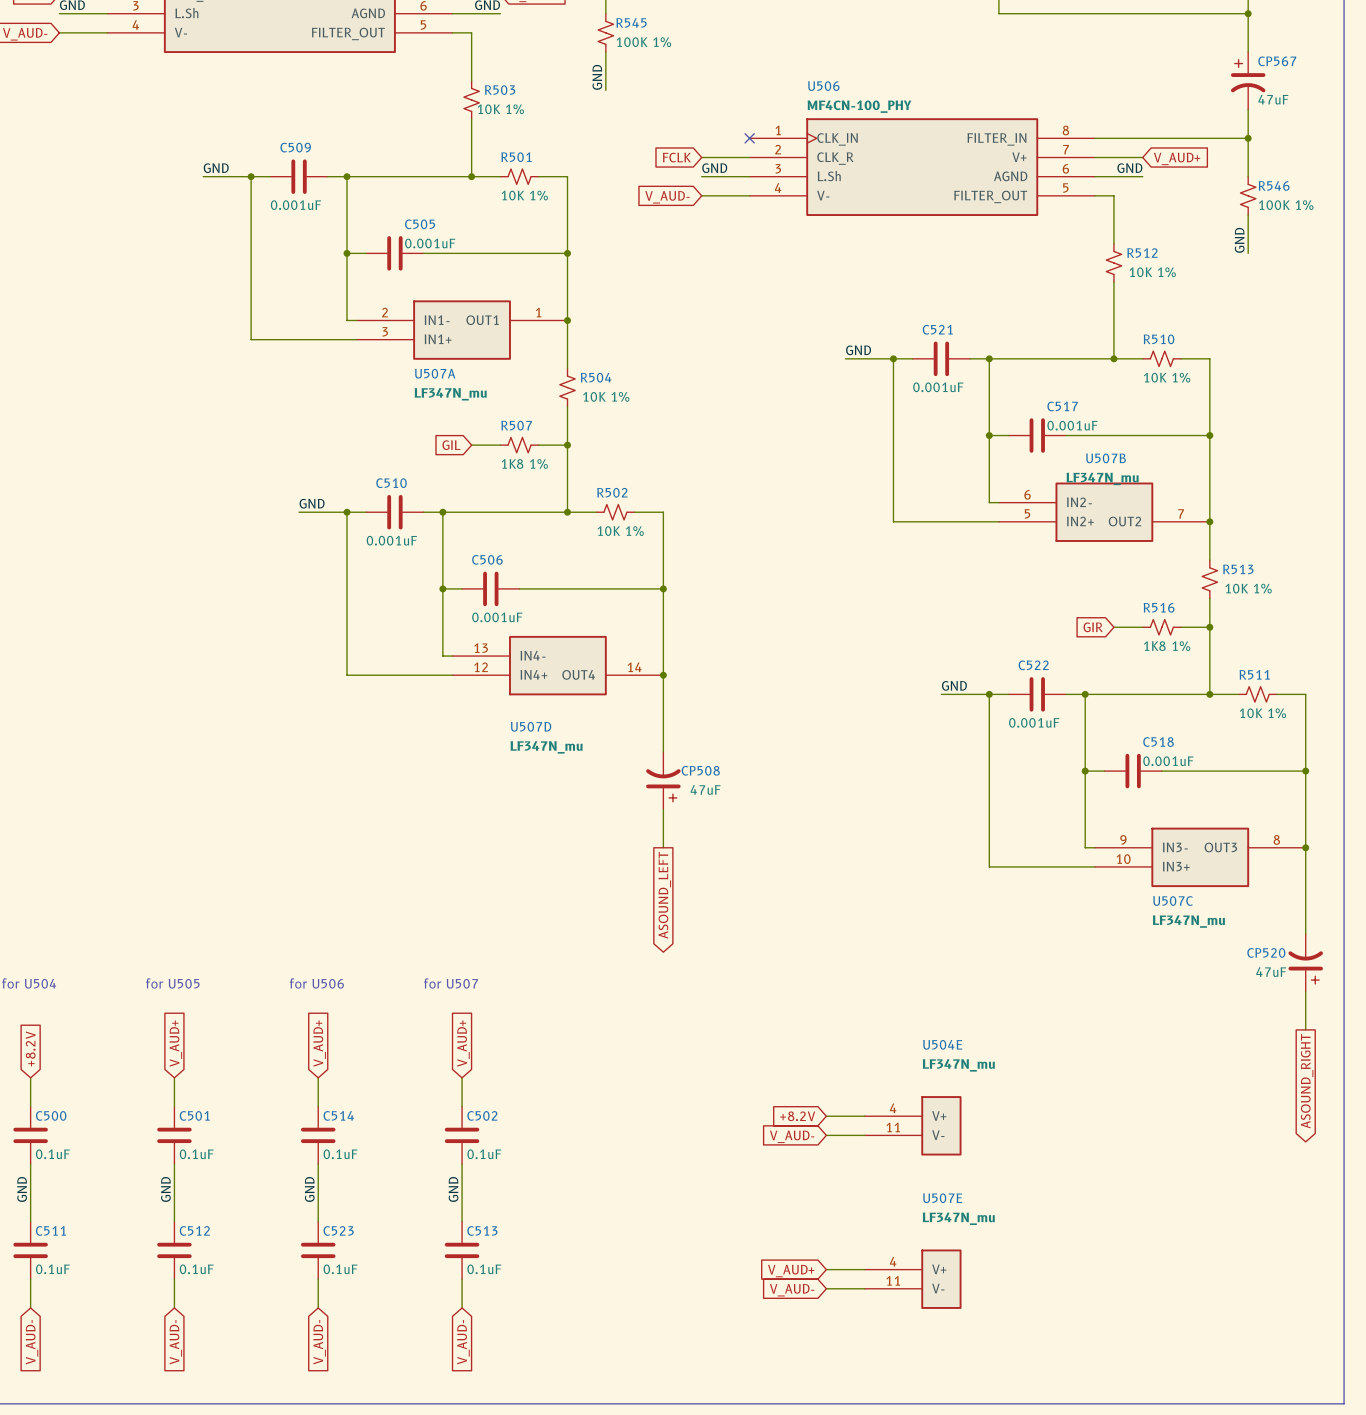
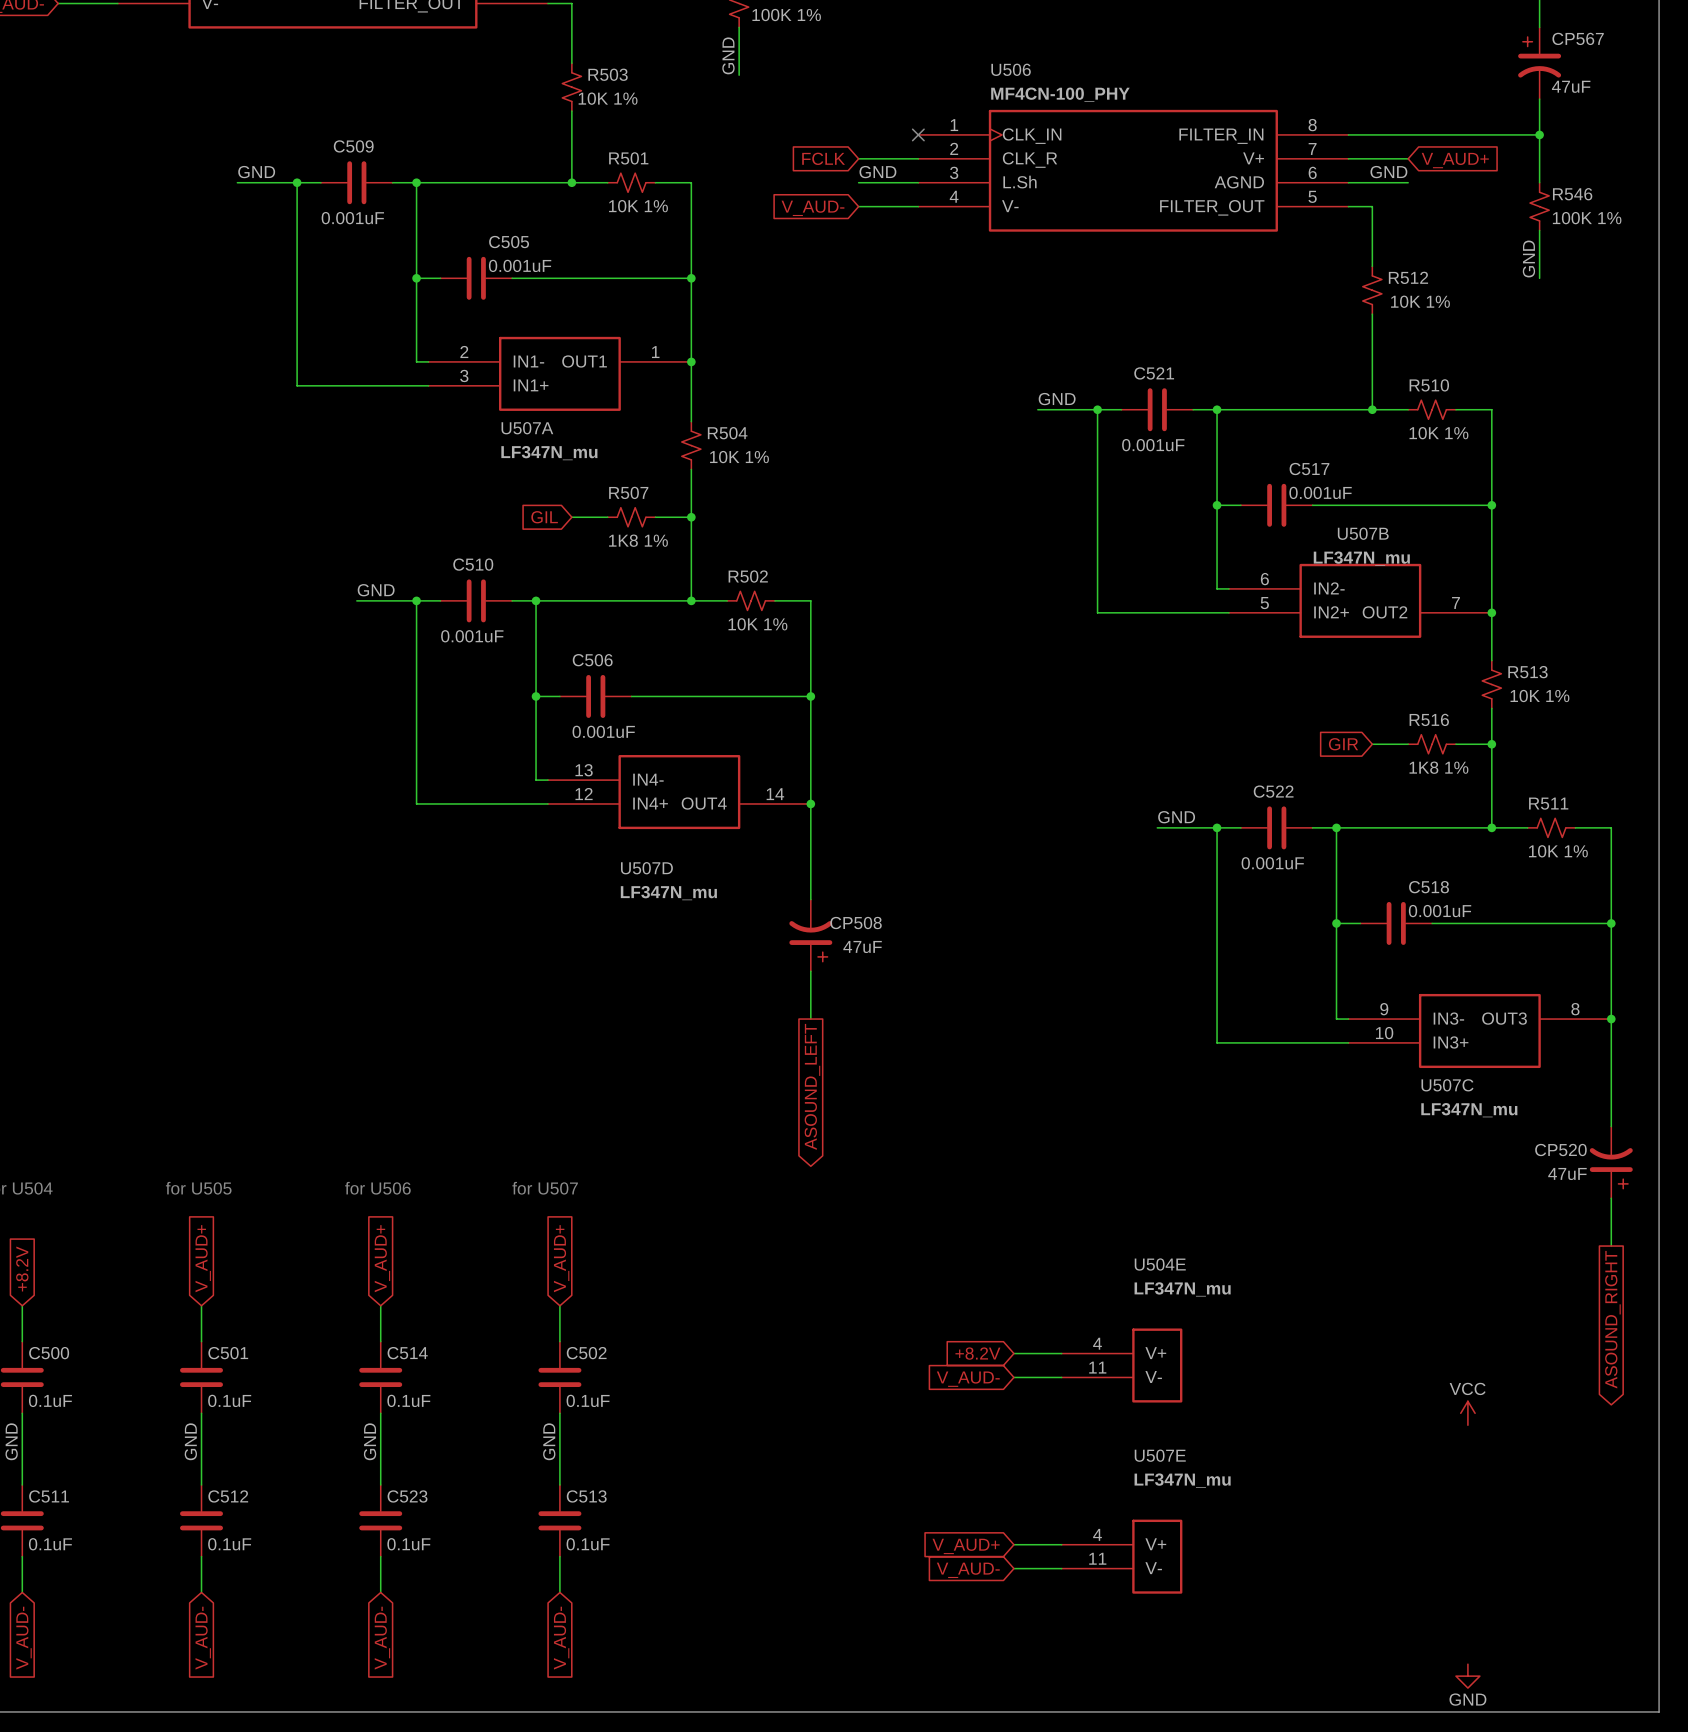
power symbol: none -> VCC (1467, 1413)
power symbol: none -> GND (1467, 1676)

